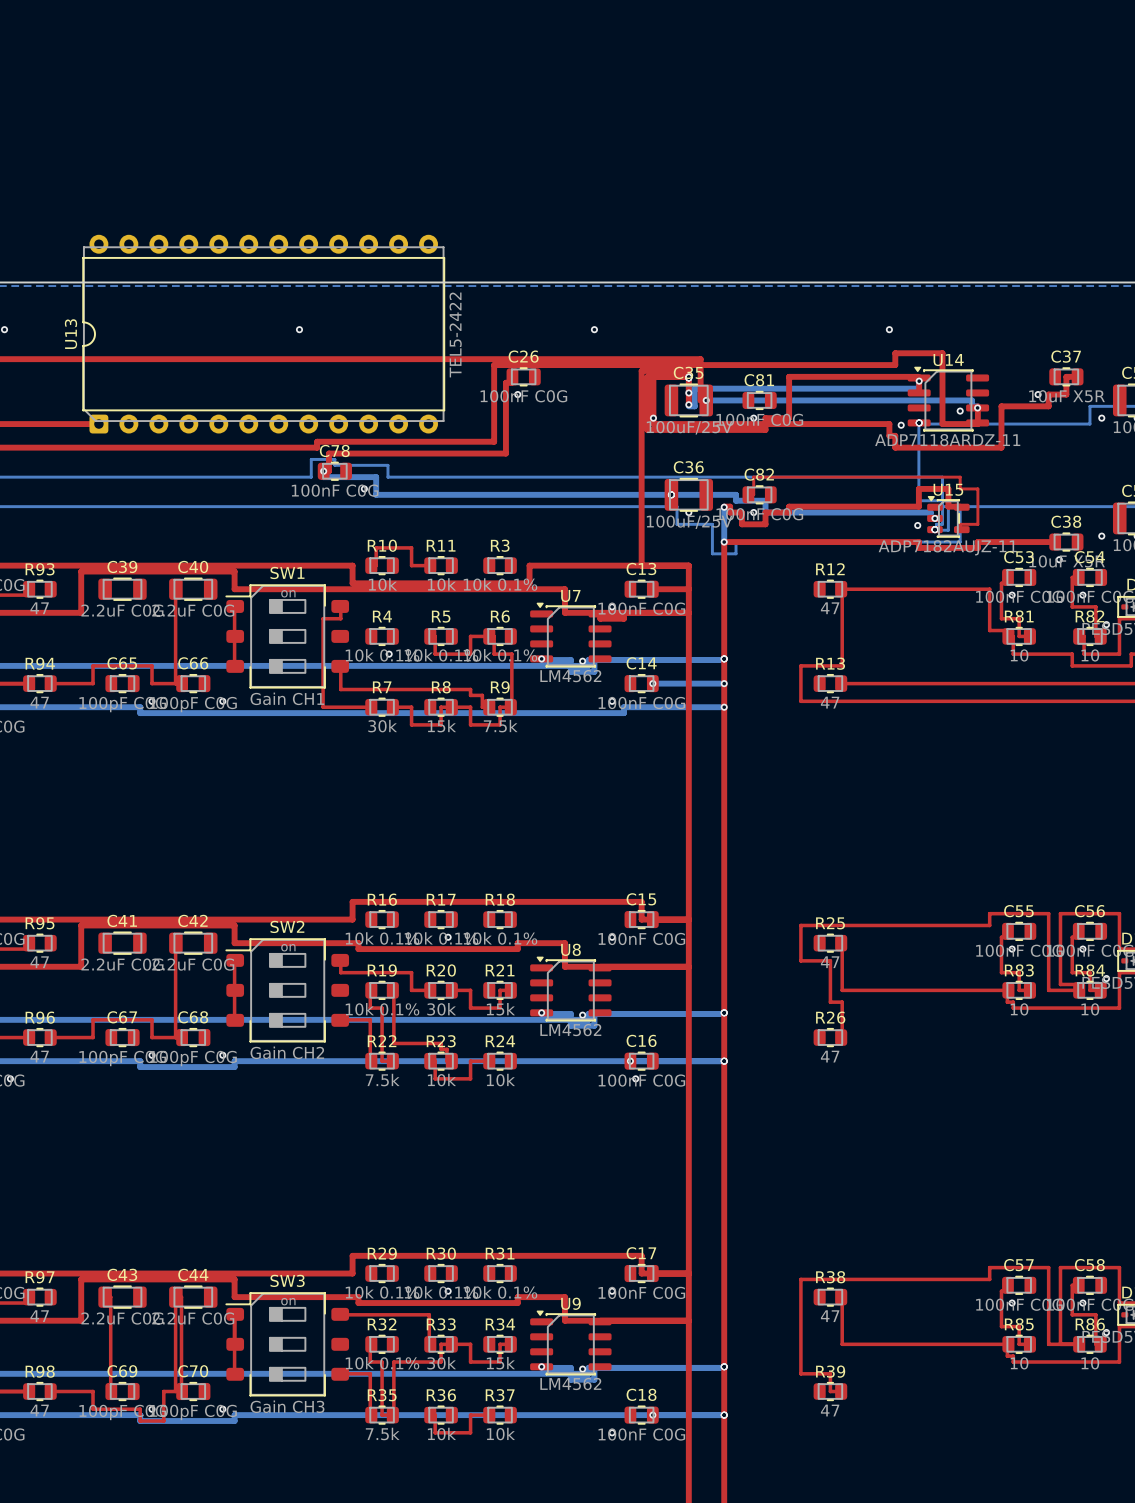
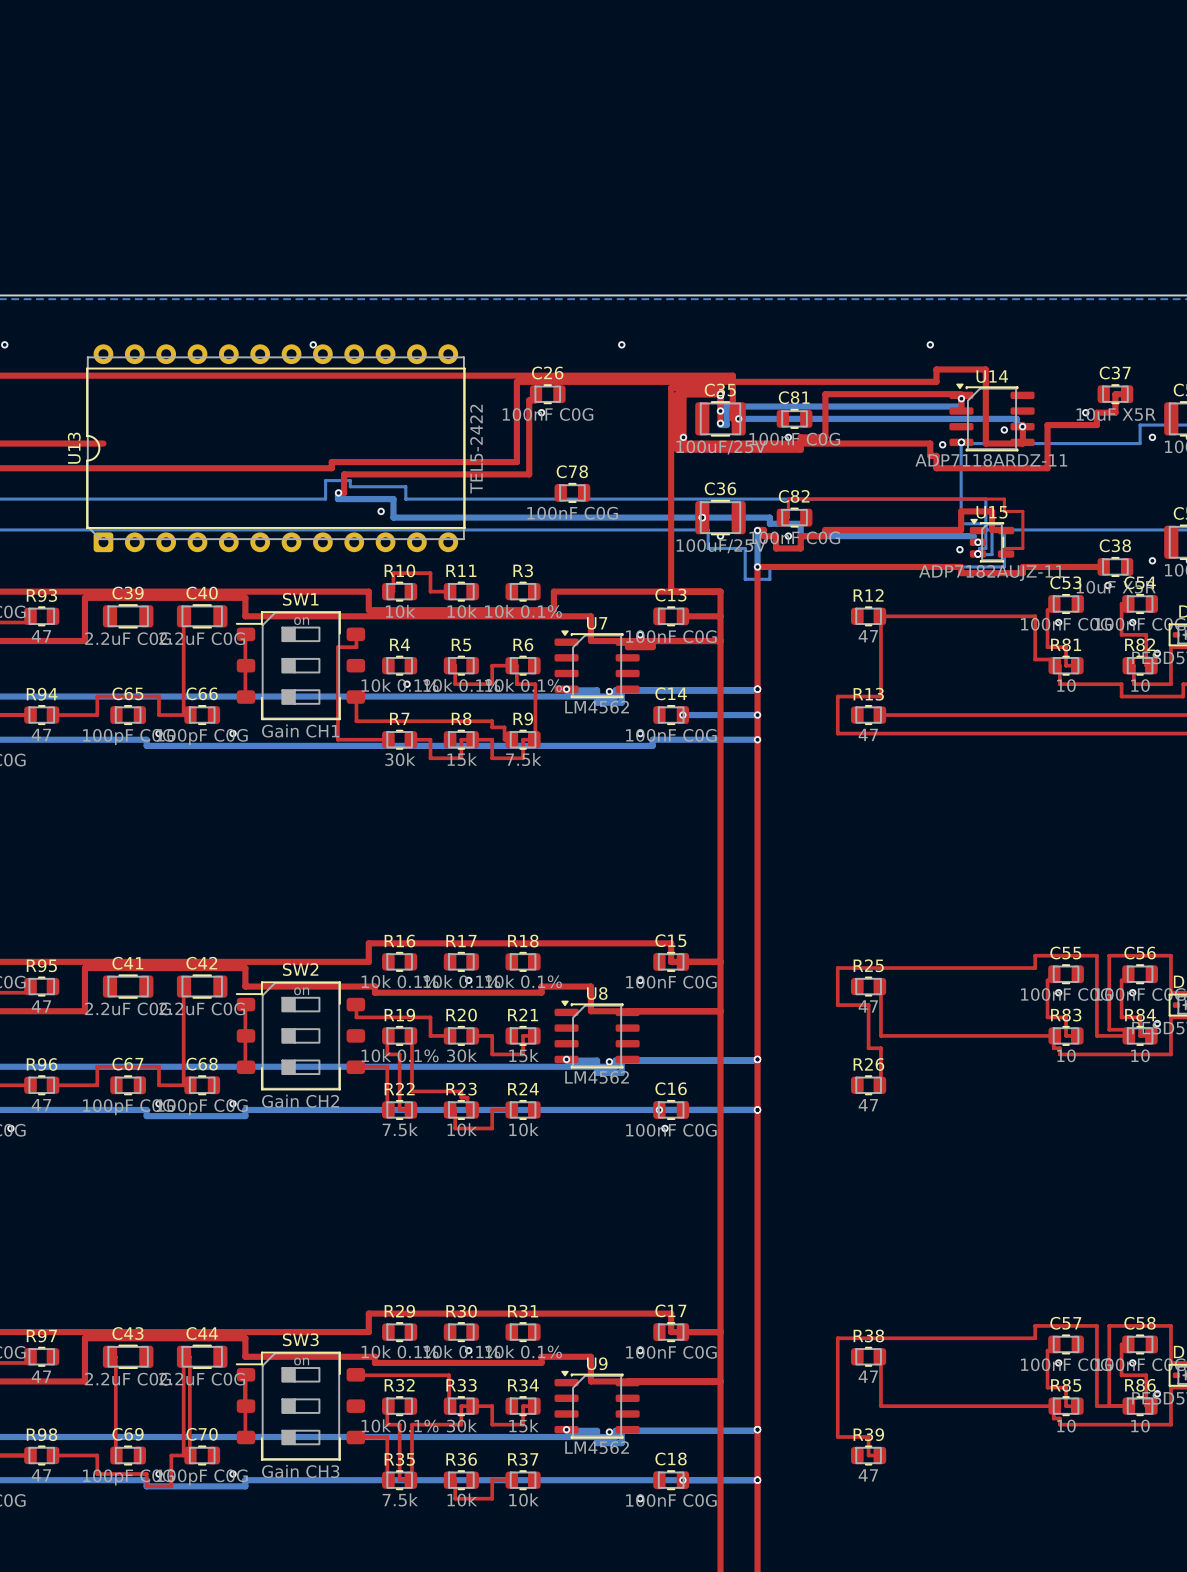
U13 position: (263, 334) -> (275, 448)
C78 position: (334, 471) -> (572, 492)

